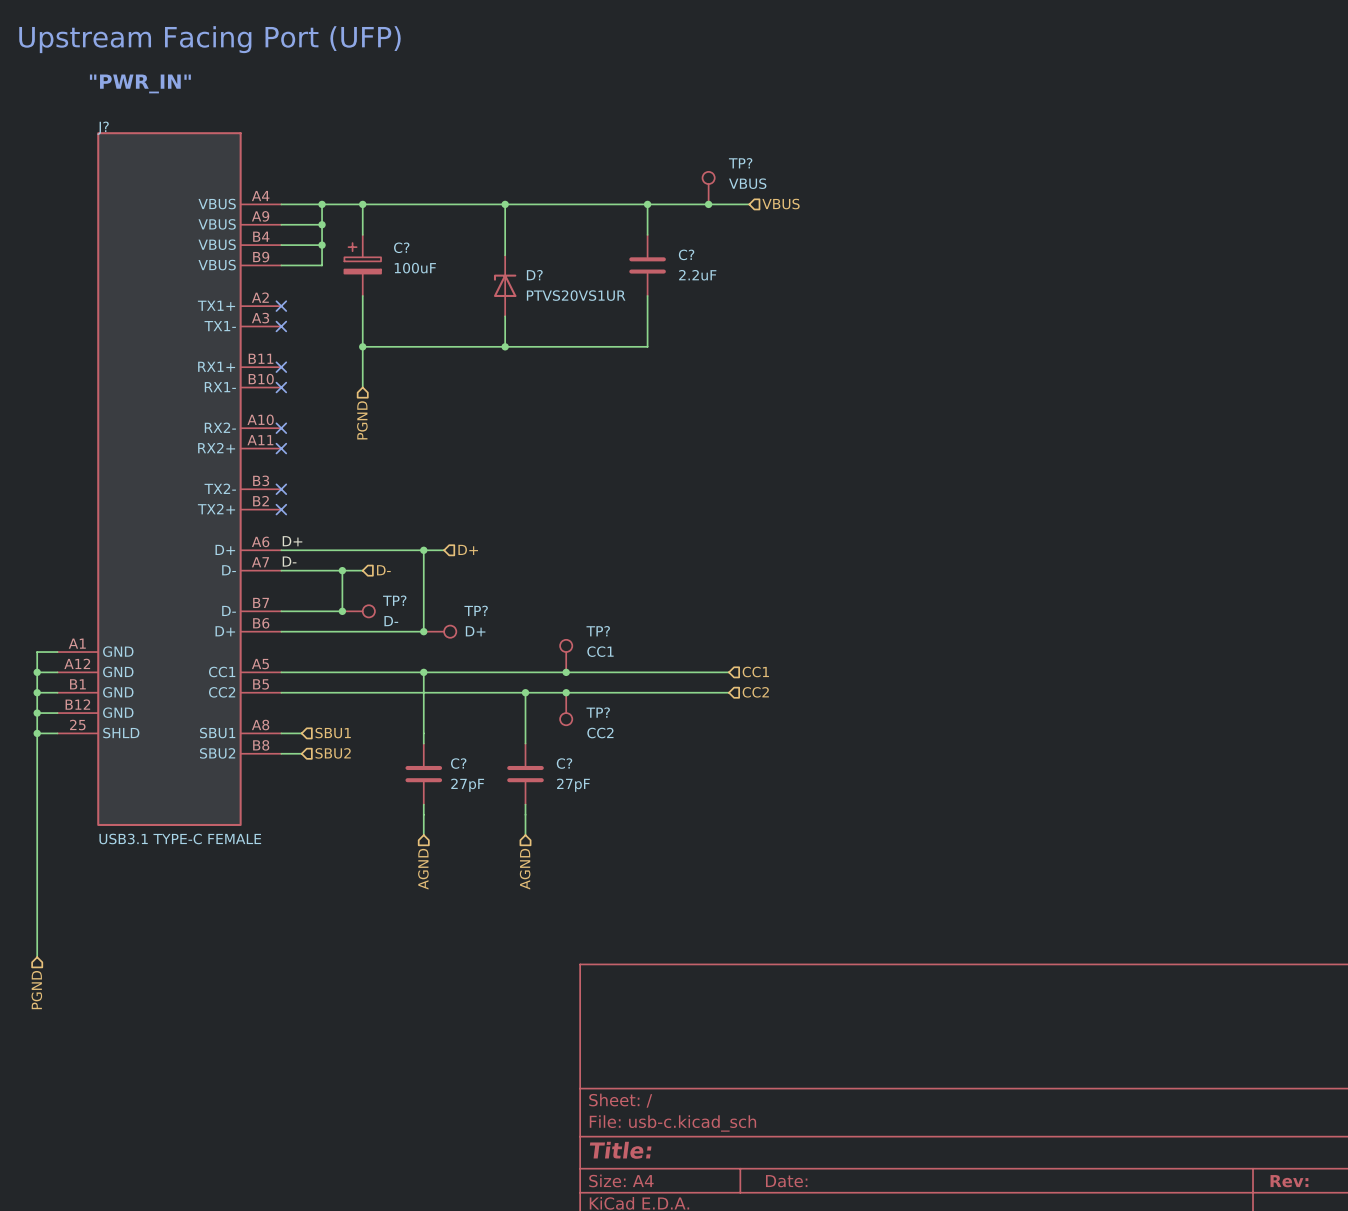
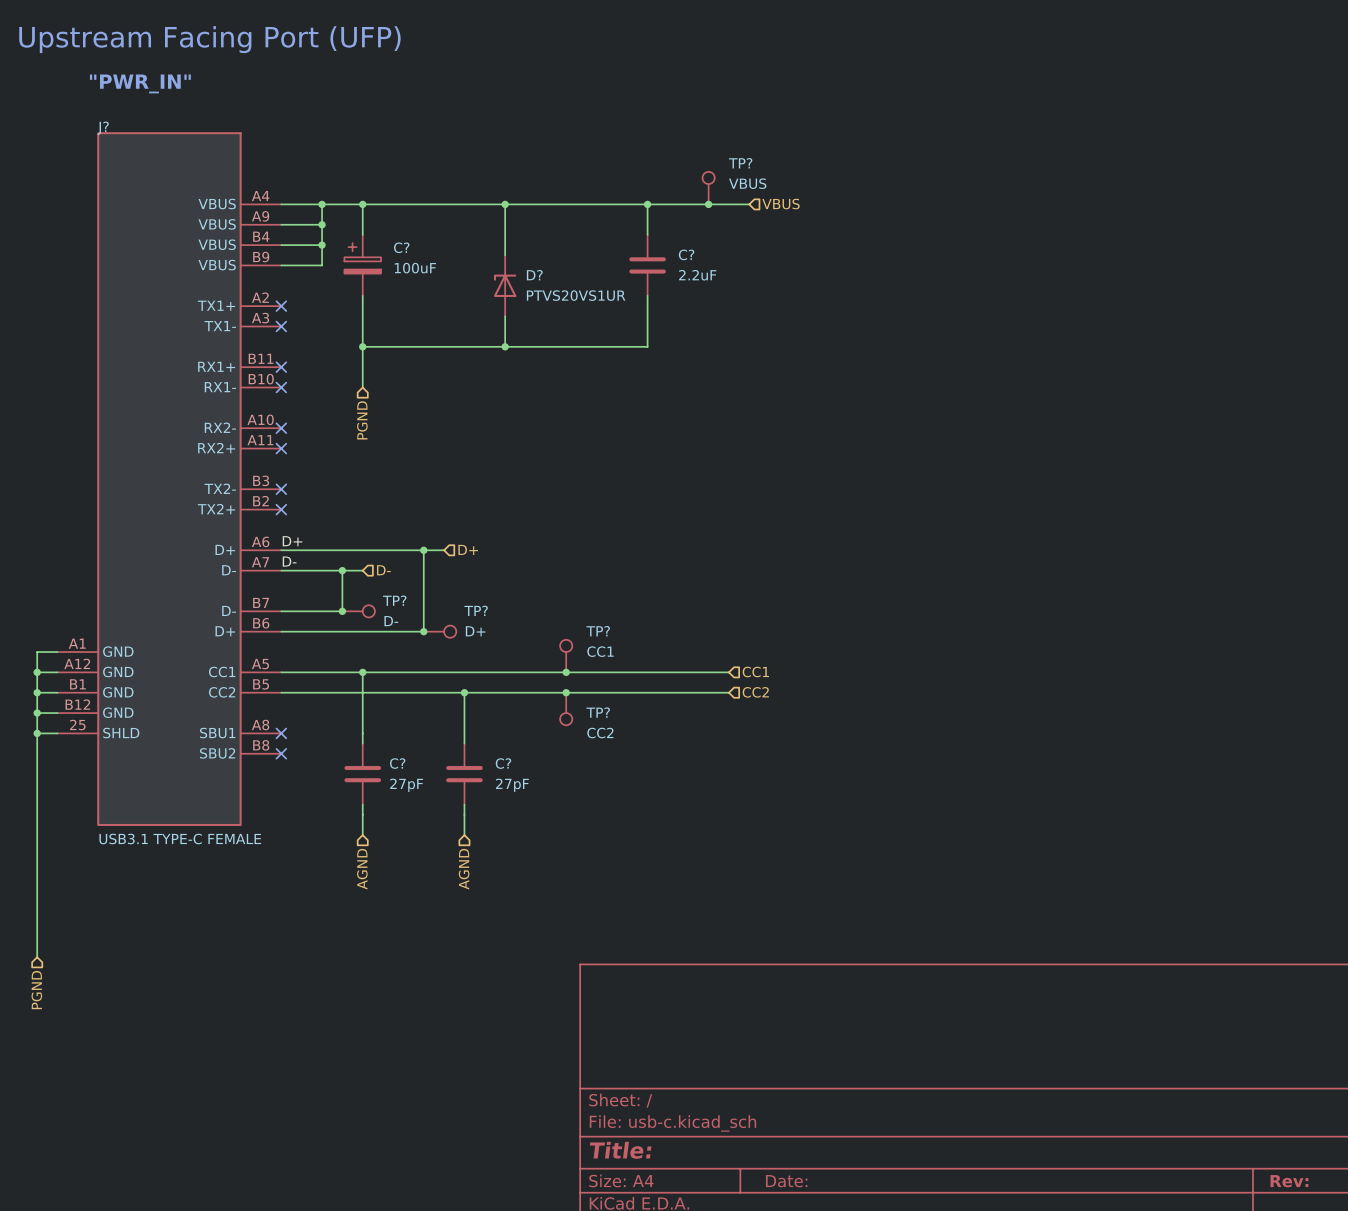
junction: none -> (362, 672)
wire: (423, 672) (423, 743) -> (362, 672) (362, 743)
junction: (423, 672) -> none
junction: none -> (464, 692)
wire: (525, 692) (525, 743) -> (464, 692) (464, 743)
junction: (525, 692) -> none
wire: (281, 733) (301, 733) -> none
no-connect mark: none -> (281, 733)
hierarchical label: SBU1 (333, 733) -> none
wire: (281, 753) (301, 753) -> none
no-connect mark: none -> (281, 753)
hierarchical label: SBU2 (333, 753) -> none
C?: none -> 27pF (362, 774)
C?: 27pF (423, 774) -> none
C?: none -> 27pF (464, 774)
C?: 27pF (525, 774) -> none
wire: (423, 804) (423, 835) -> (362, 804) (362, 835)
wire: (525, 804) (525, 835) -> (464, 804) (464, 835)
hierarchical label: none -> AGND (362, 869)
hierarchical label: AGND (423, 869) -> none
hierarchical label: none -> AGND (464, 869)
hierarchical label: AGND (525, 869) -> none

